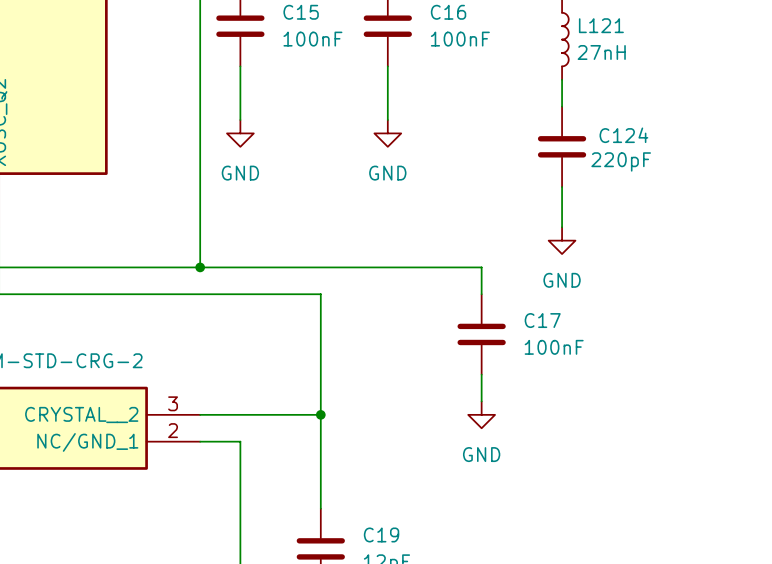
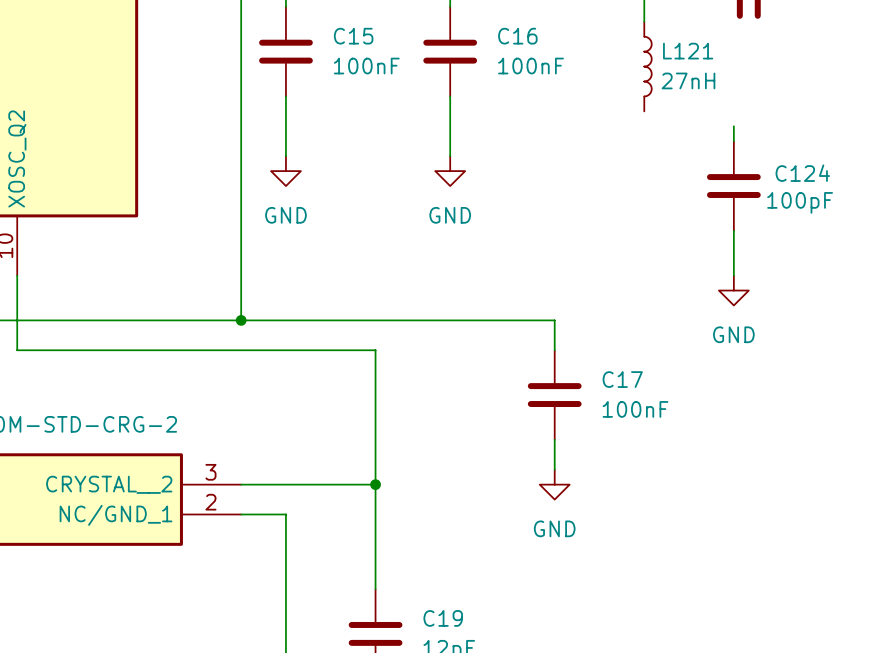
wire: (562, 79) (562, 106) -> none
wire: none -> (733, 126) (733, 141)
C124 position: (562, 146) -> (733, 186)
C124 value: 220pF (621, 161) -> 100pF (800, 202)
wire: (562, 187) (562, 227) -> (733, 230) (733, 275)
power symbol position: GND (562, 240) -> GND (733, 290)

